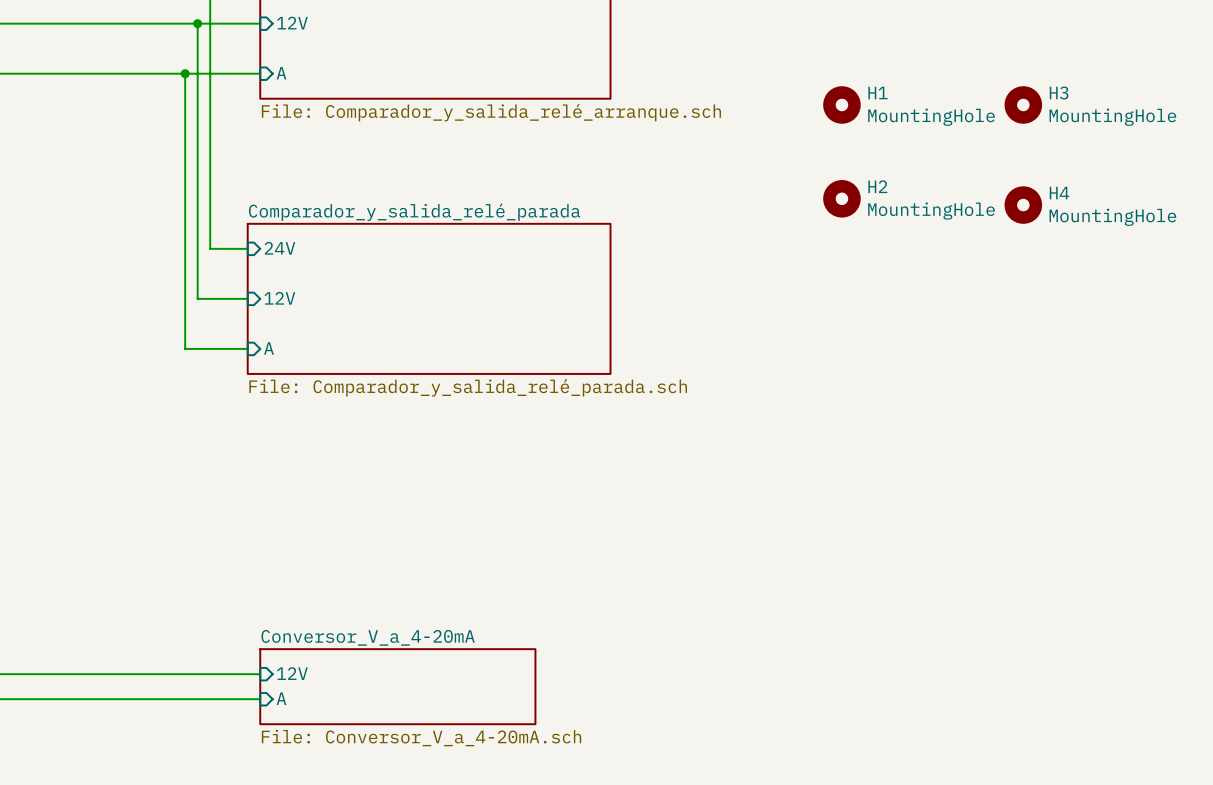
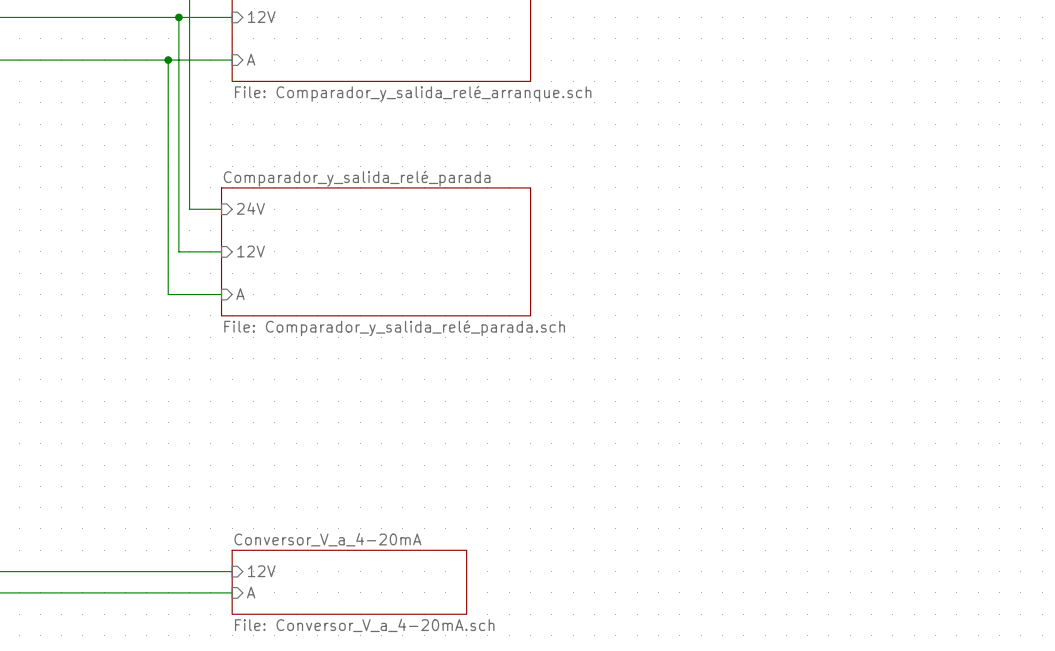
H1: MountingHole (841, 104) -> none
H3: MountingHole (1023, 104) -> none
H2: MountingHole (841, 198) -> none
H4: MountingHole (1023, 205) -> none

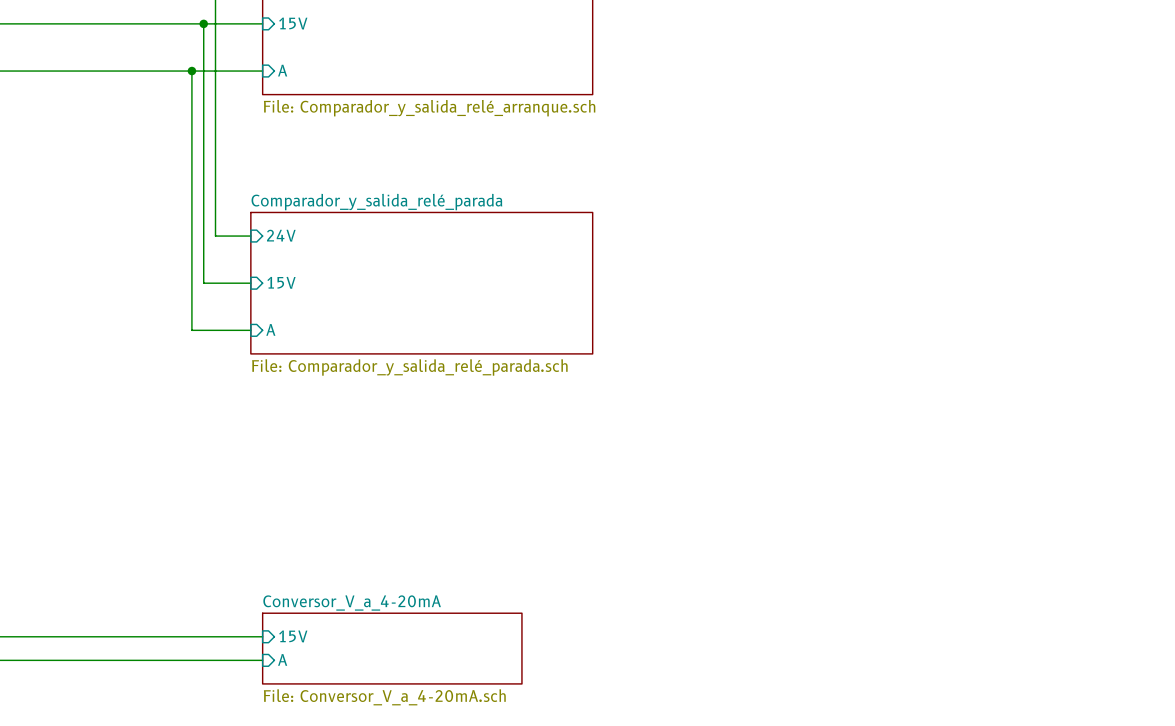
sheet pin: 12V (261, 17) -> 15V (293, 23)
sheet pin: 12V (251, 251) -> 15V (281, 282)
sheet pin: 12V (261, 571) -> 15V (293, 636)

